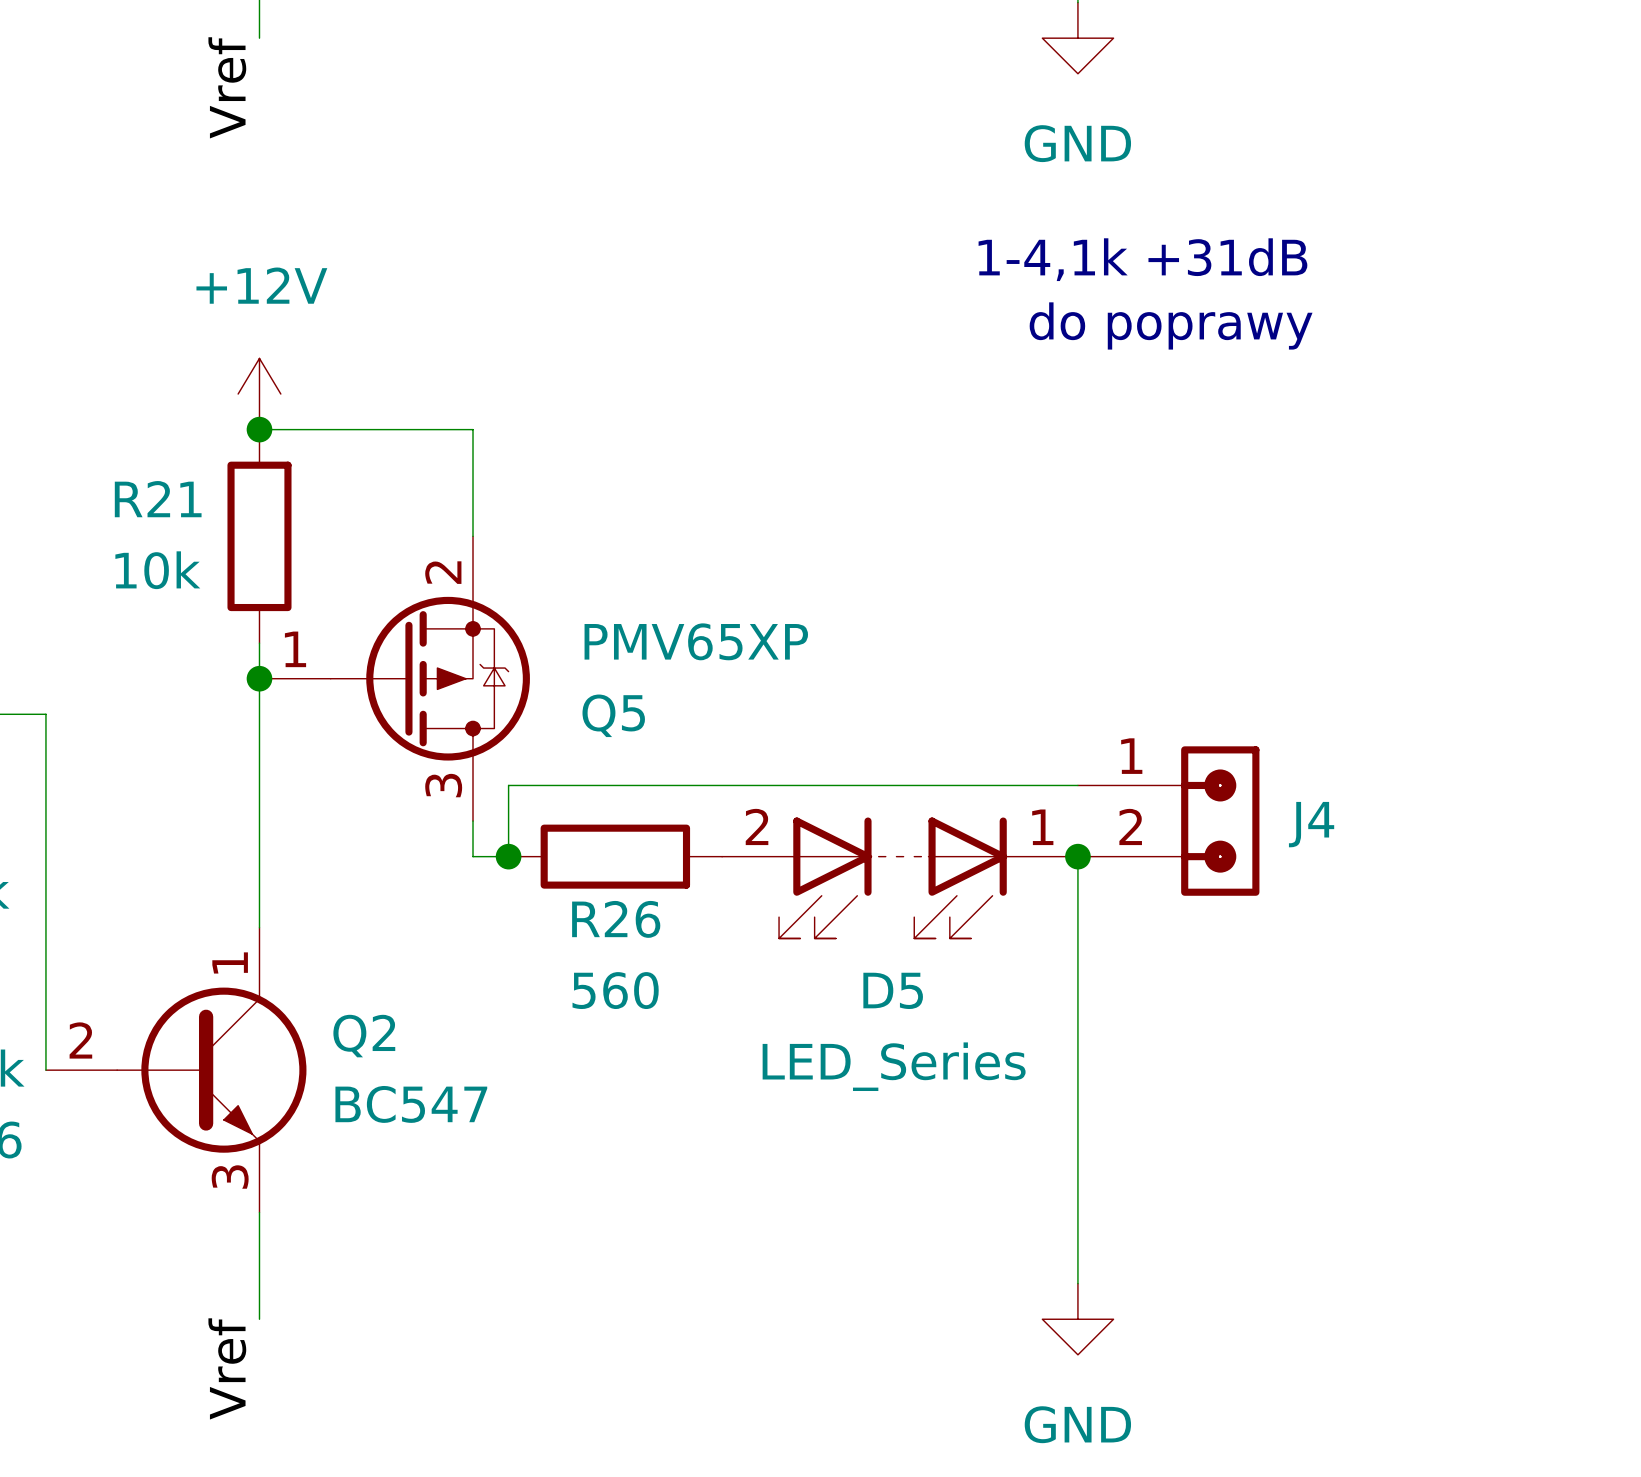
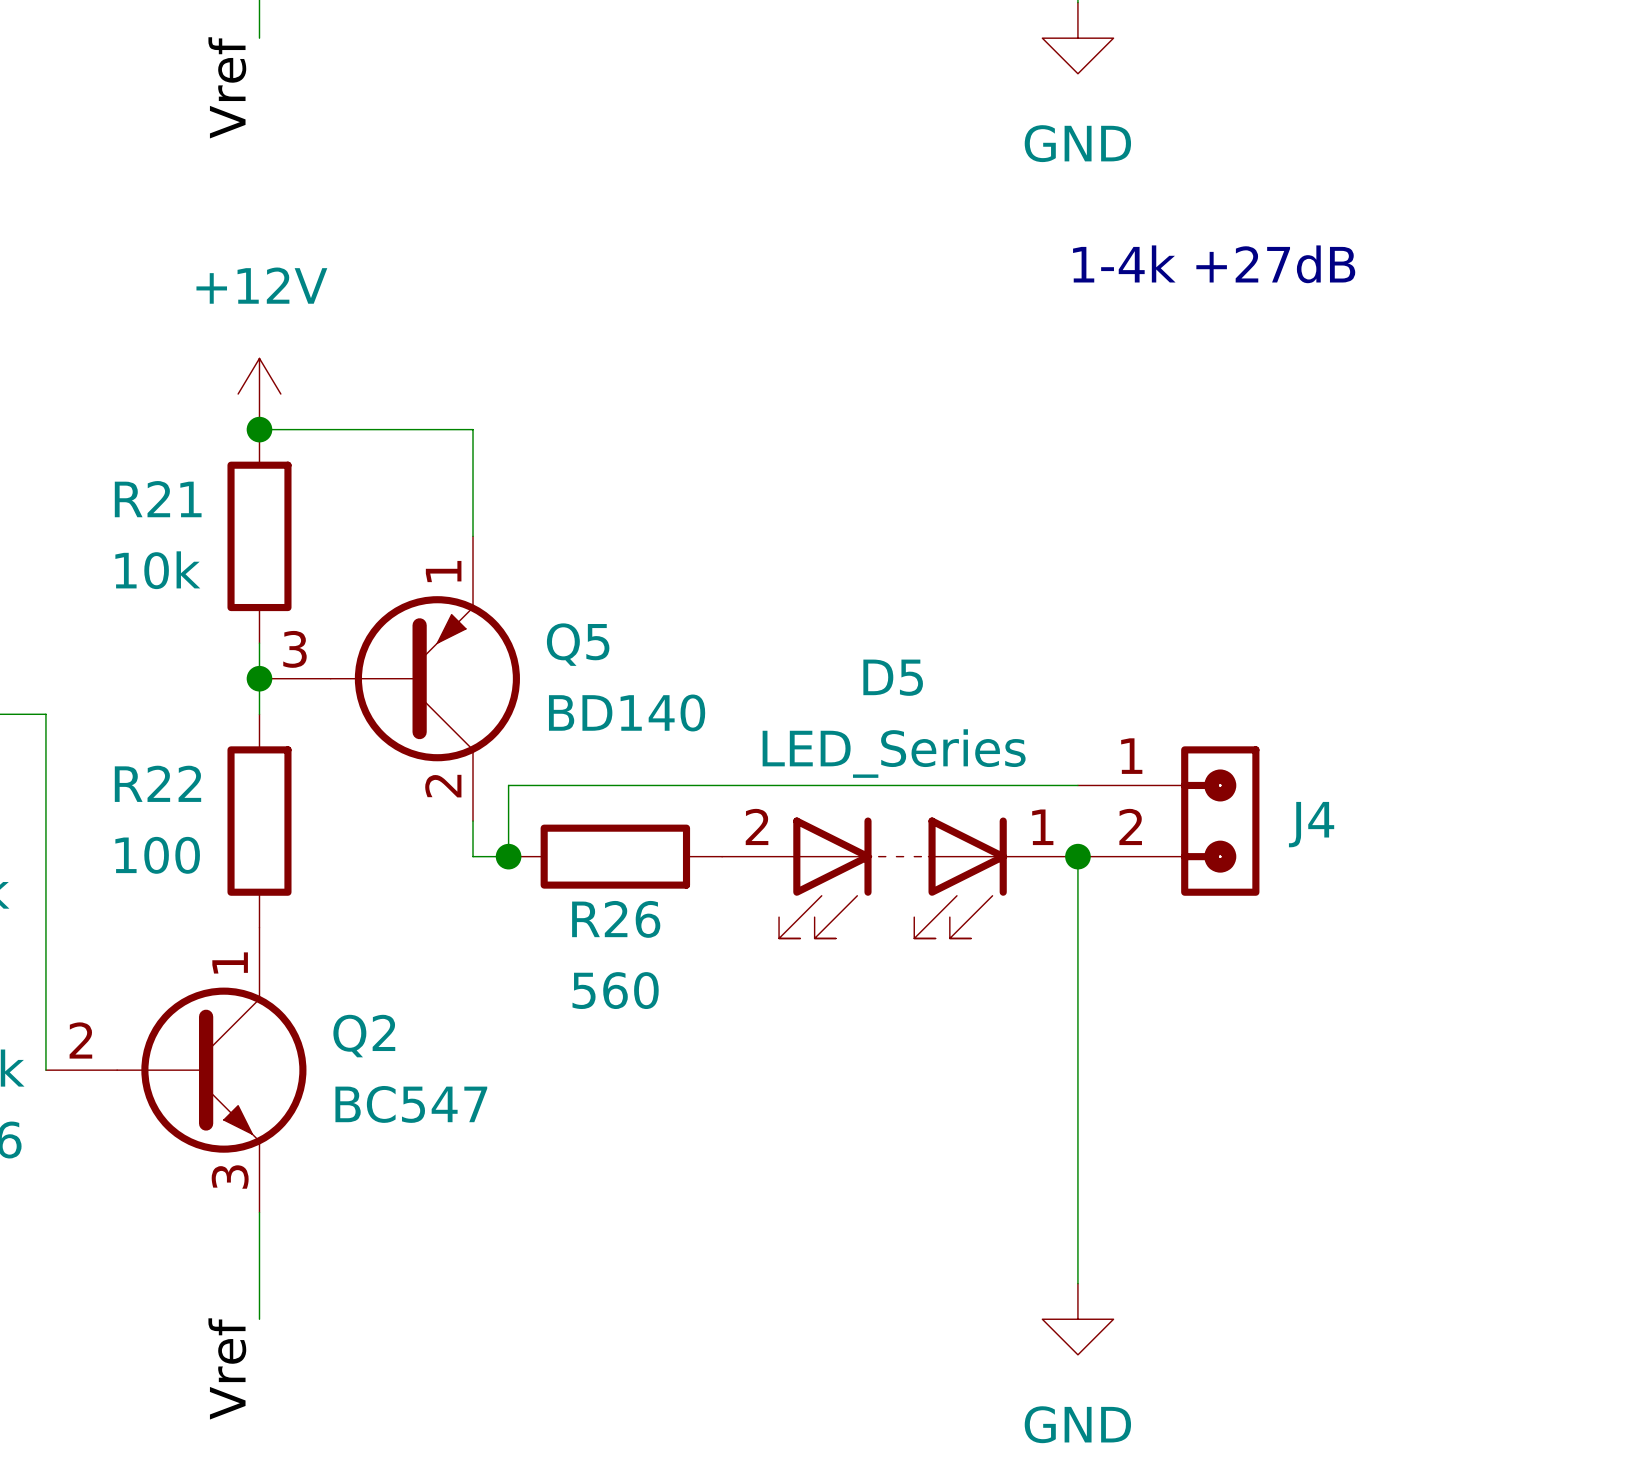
text: 1-4,1k +31dB (1142, 259) -> 1-4k +27dB (1214, 264)
text: do poprawy (1171, 325) -> none
Q5 symbol: [259, 536, 530, 822] -> [259, 536, 520, 822]
Q5 value: PMV65XP (696, 641) -> BD140 (627, 712)
wire: (259, 714) (259, 927) -> none
Q5 name position: Q5 (613, 715) -> Q5 (578, 644)
R22: none -> 100 (259, 821)
D5 name position: D5 (893, 990) -> D5 (893, 677)
D5 value position: LED_Series (894, 1066) -> LED_Series (894, 753)

